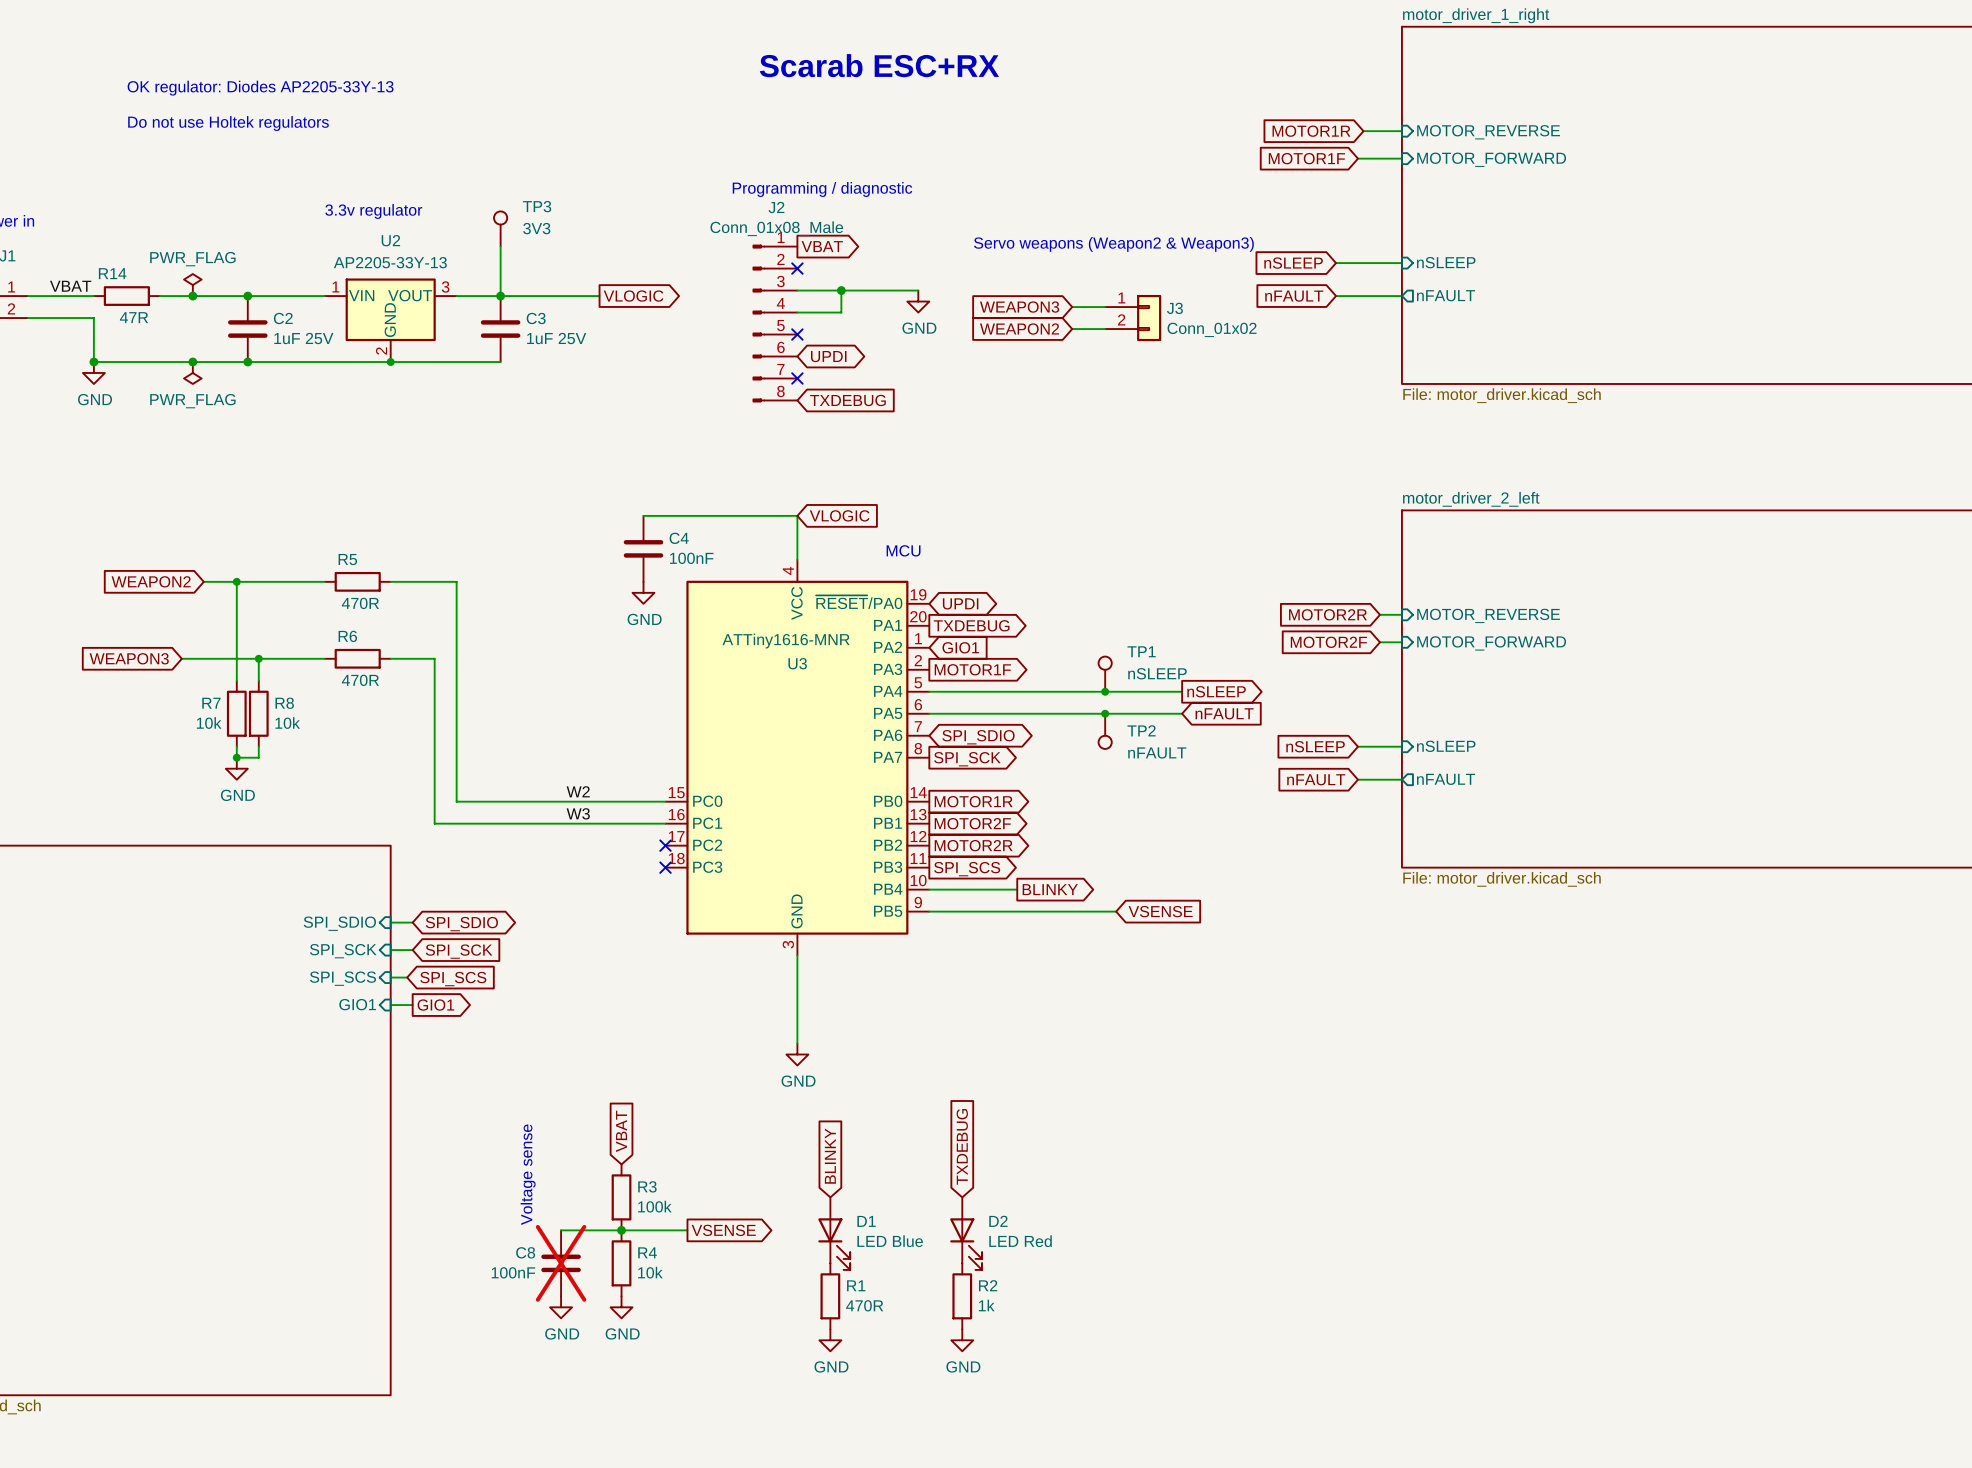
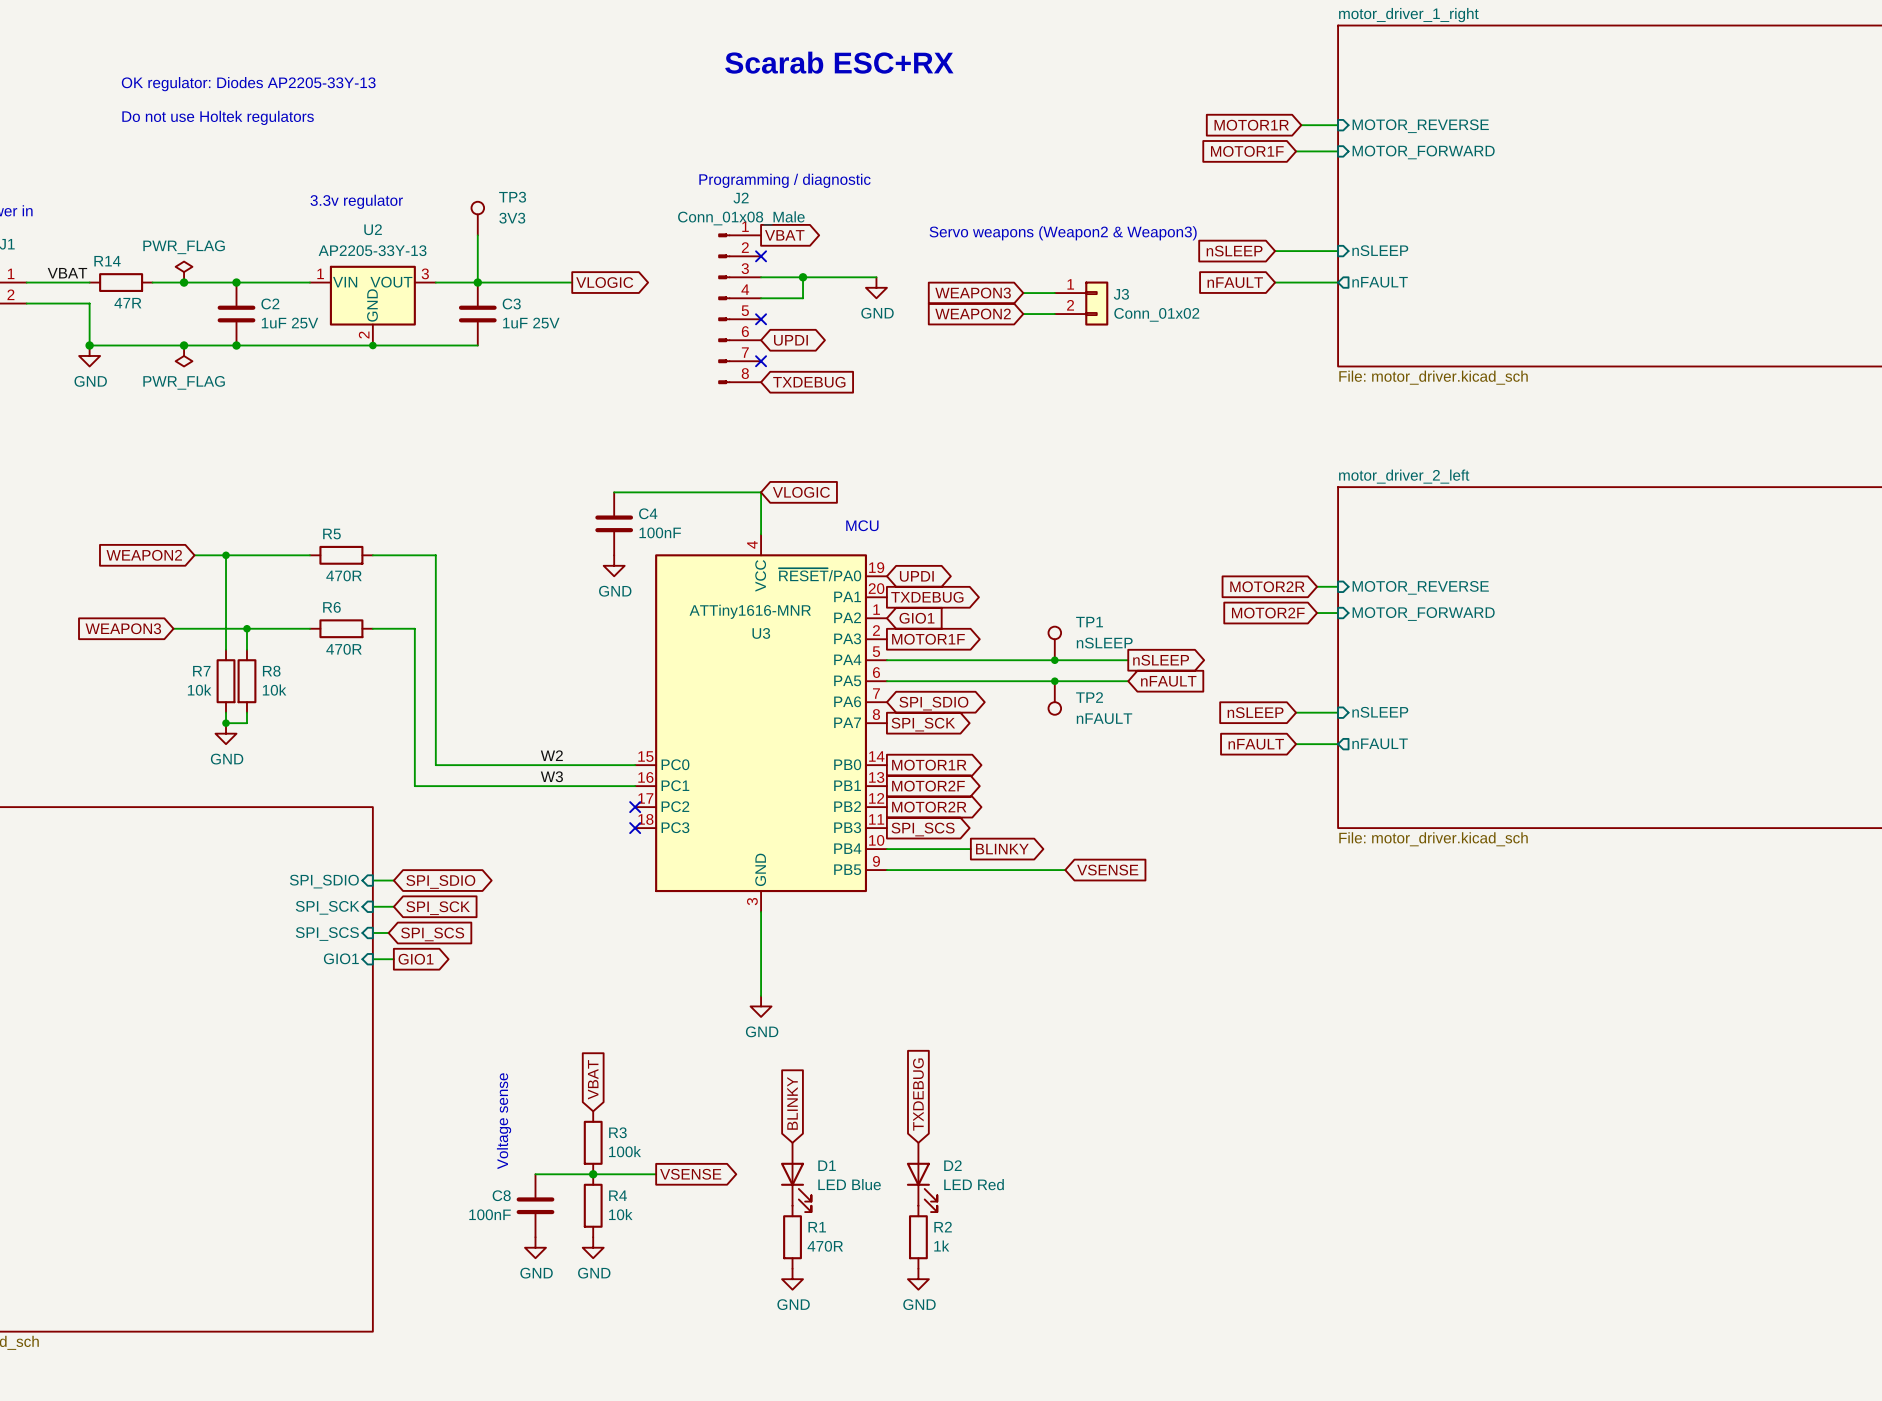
C8 do-not-place cross: (561, 1263) -> none

